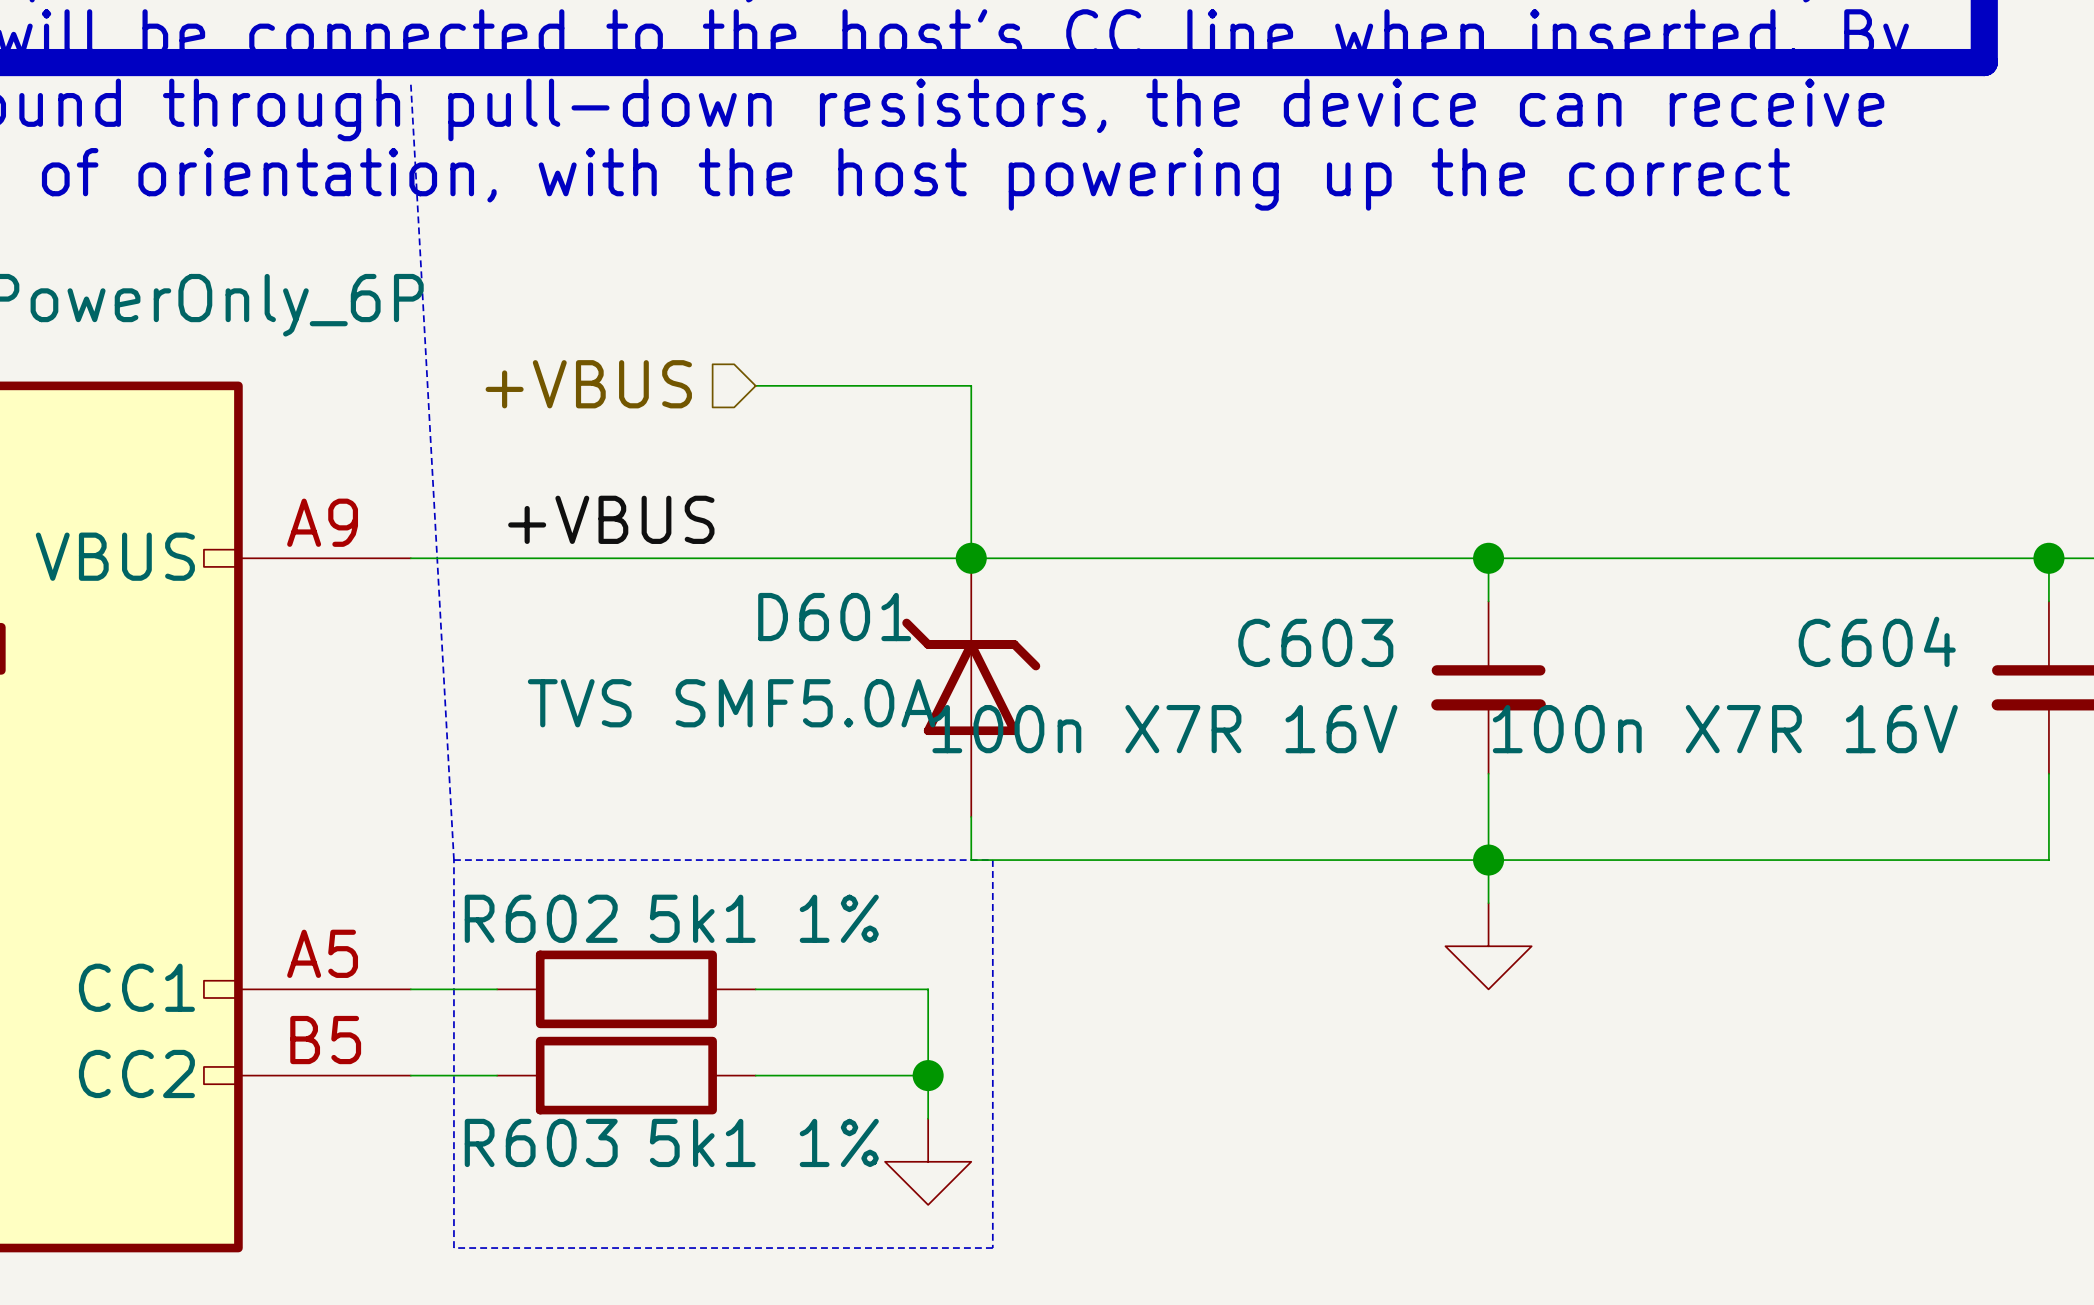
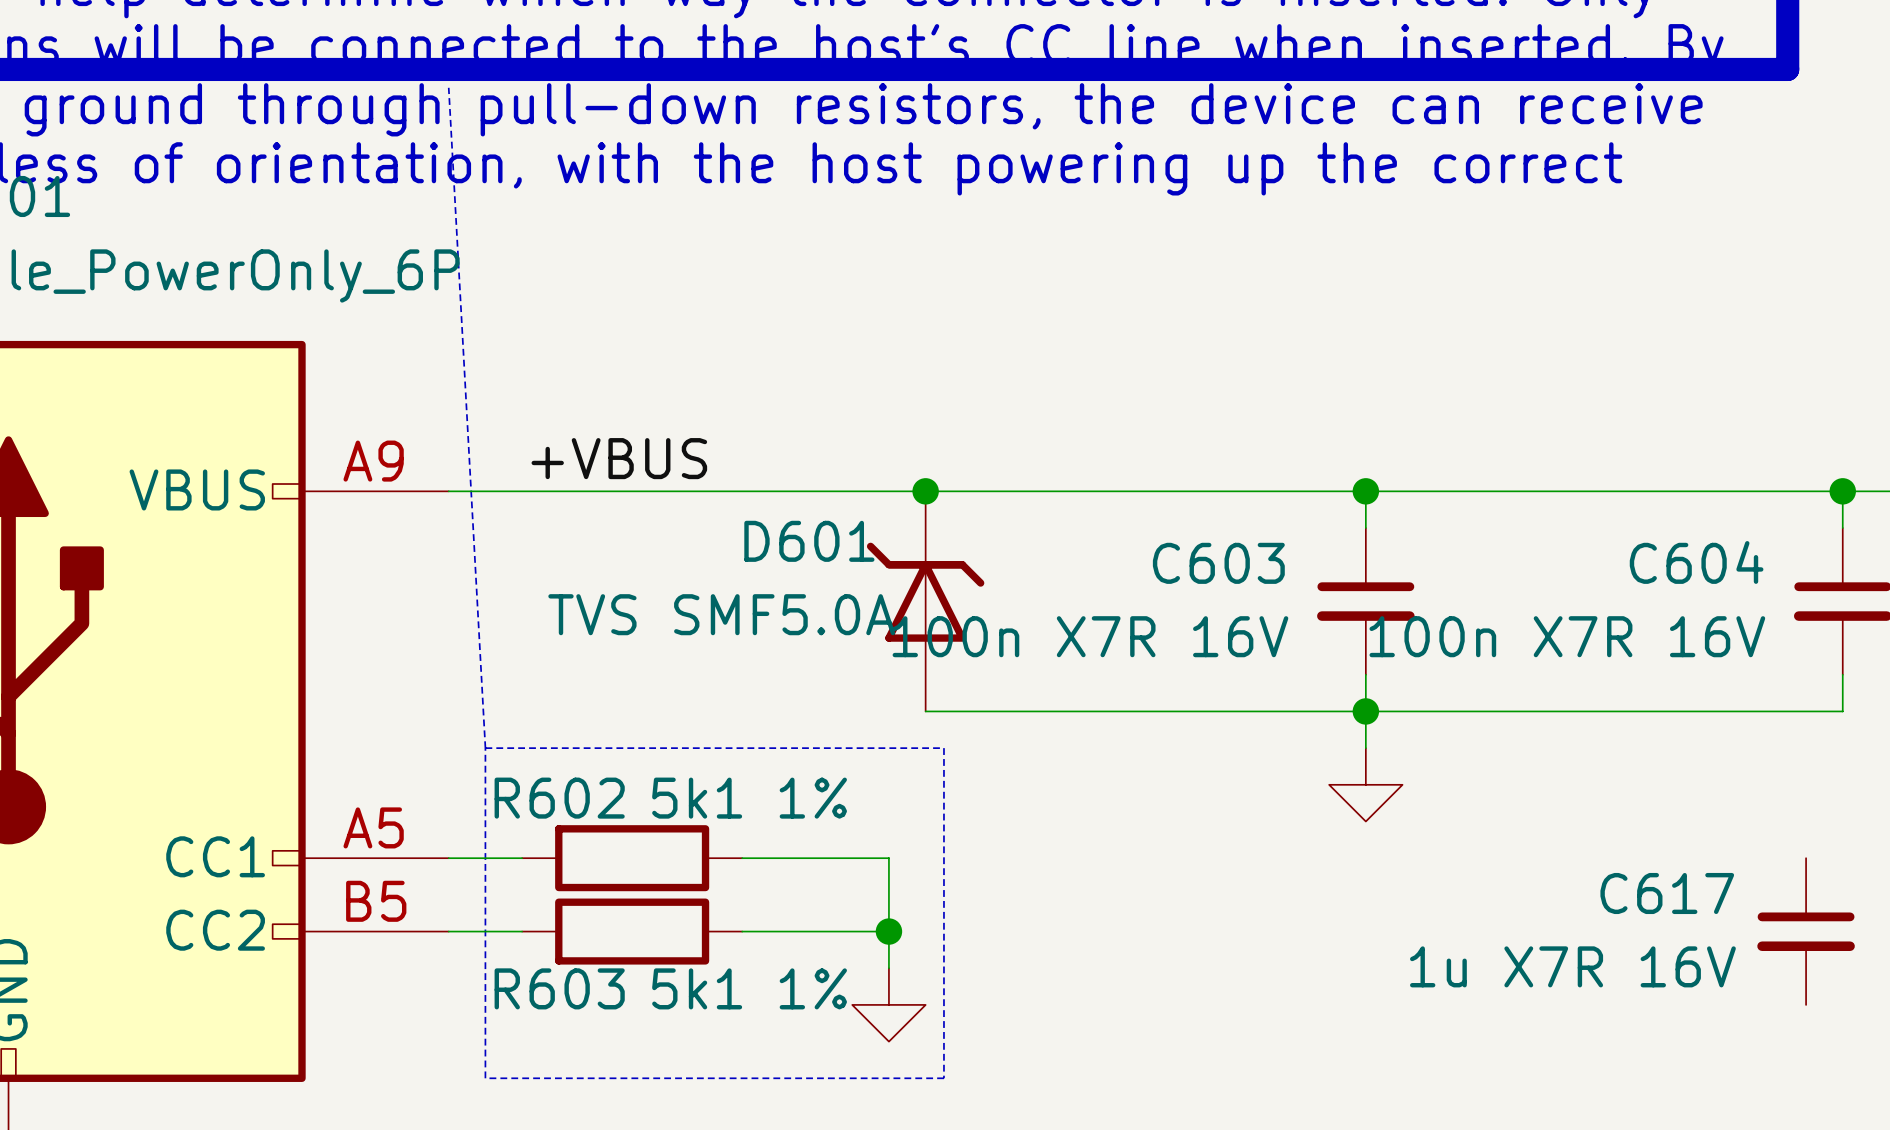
hierarchical label: +VBUS (588, 384) -> none
wire: (755, 385) (971, 385) (971, 558) -> none
wire: (971, 816) (971, 860) (2048, 860) (2048, 816) -> (925, 711) (1842, 711)
junction position: (1488, 860) -> (1365, 711)
power symbol position: (1488, 946) -> (1365, 784)
C617: none -> 1u X7R 16V (1806, 931)

